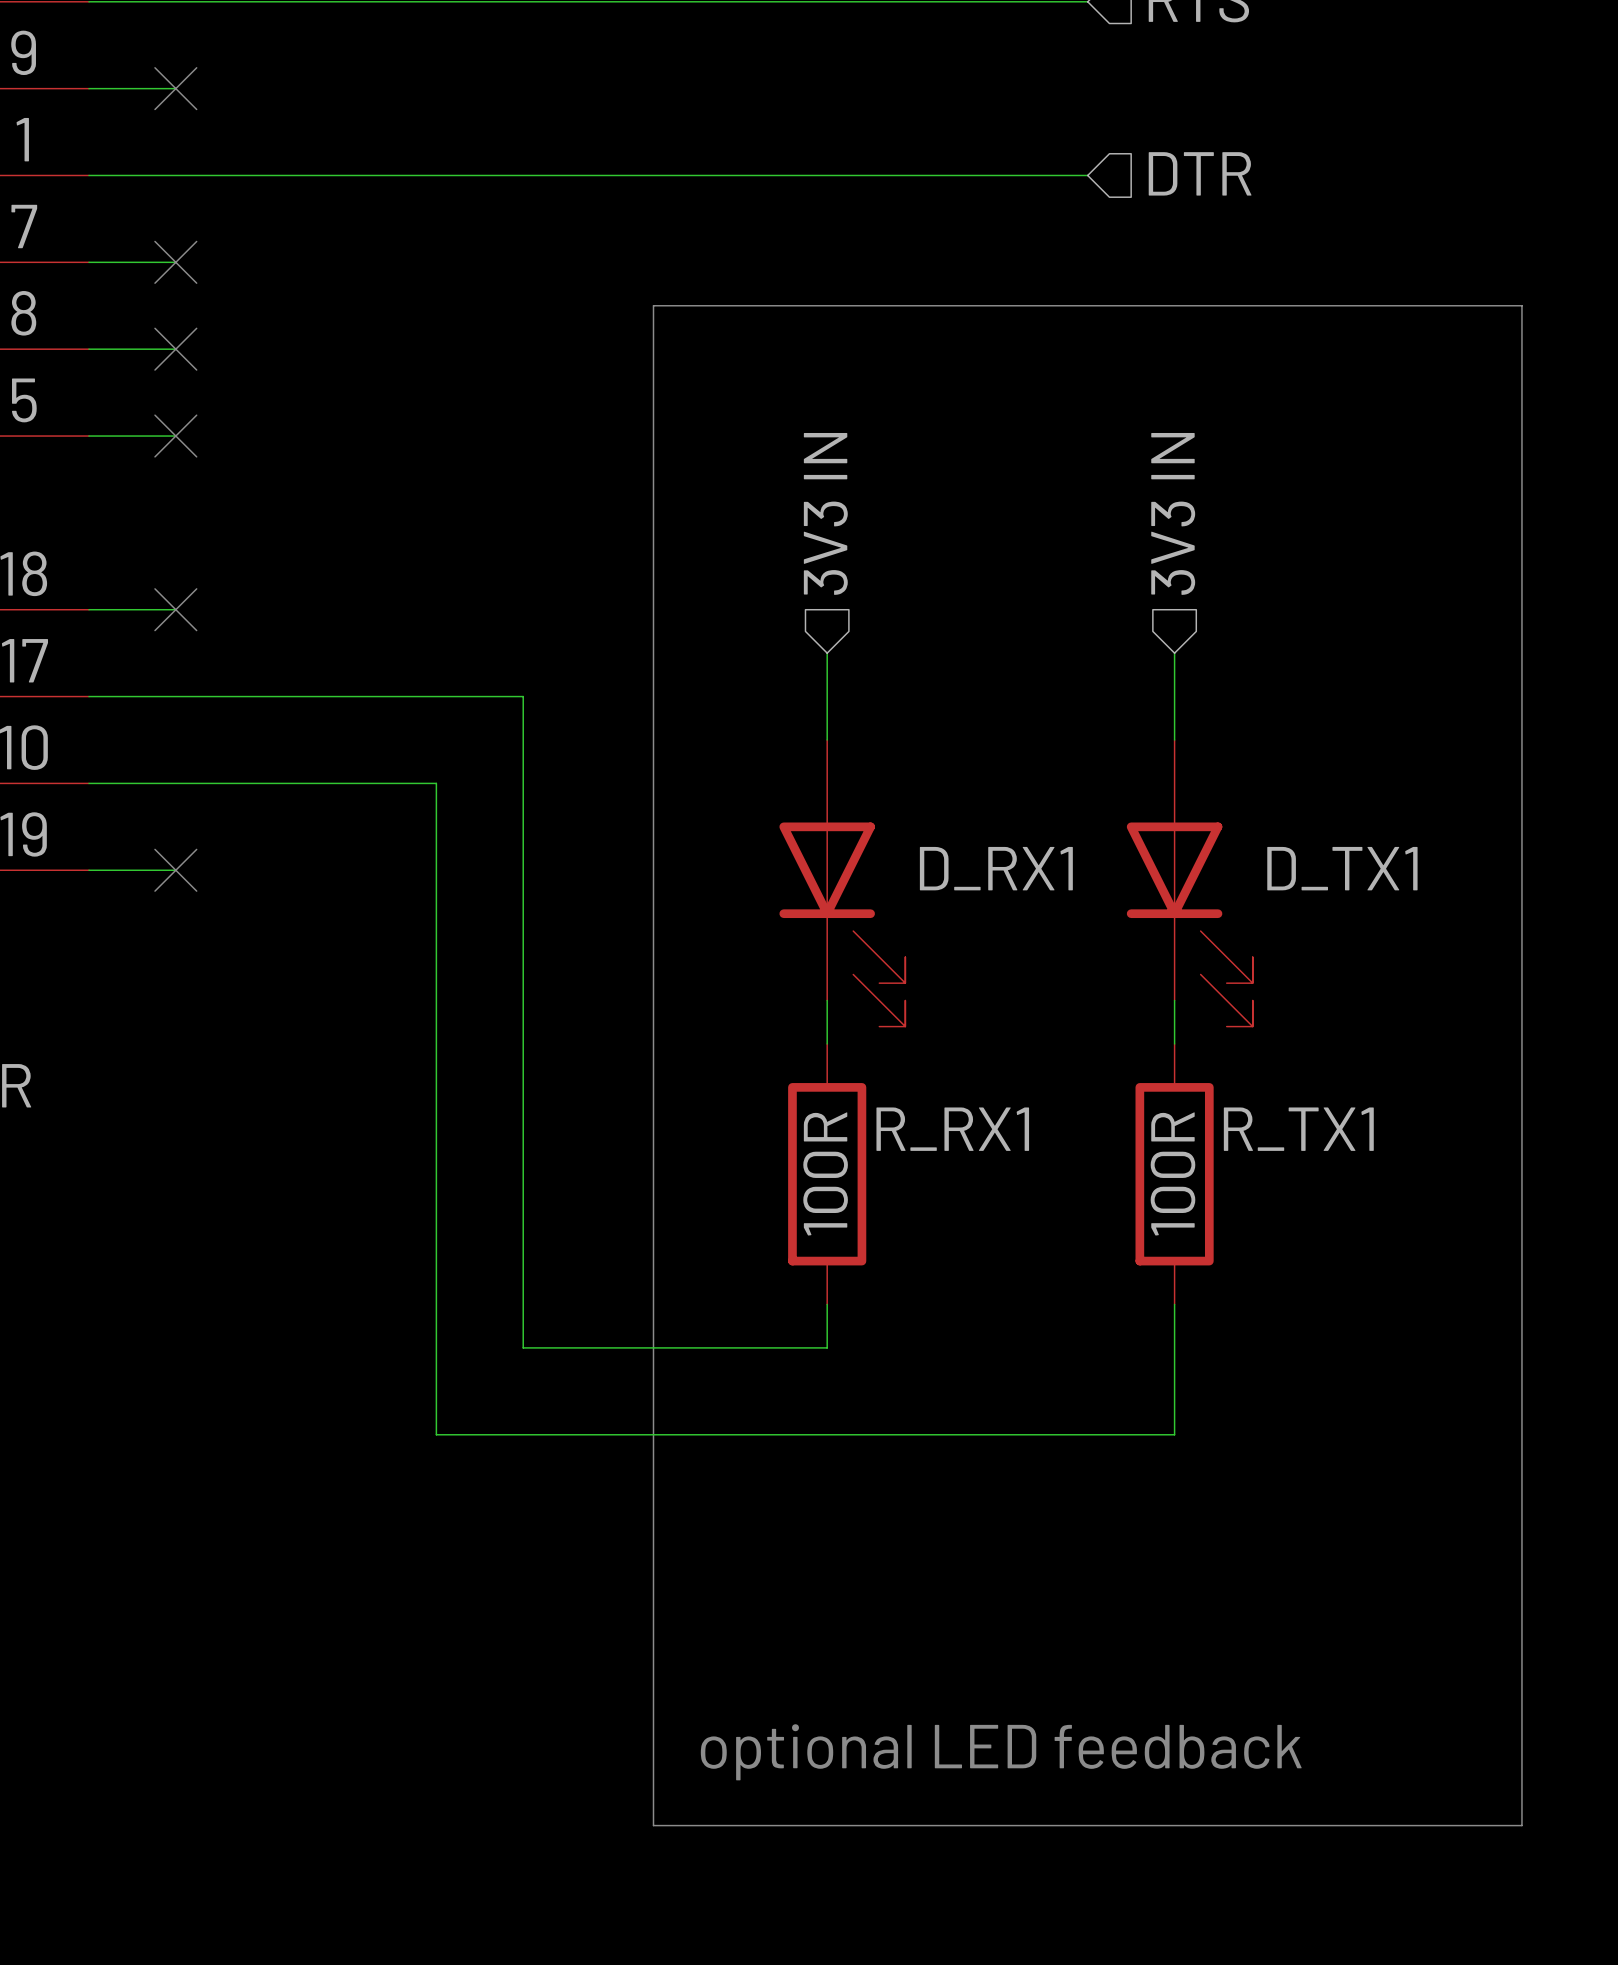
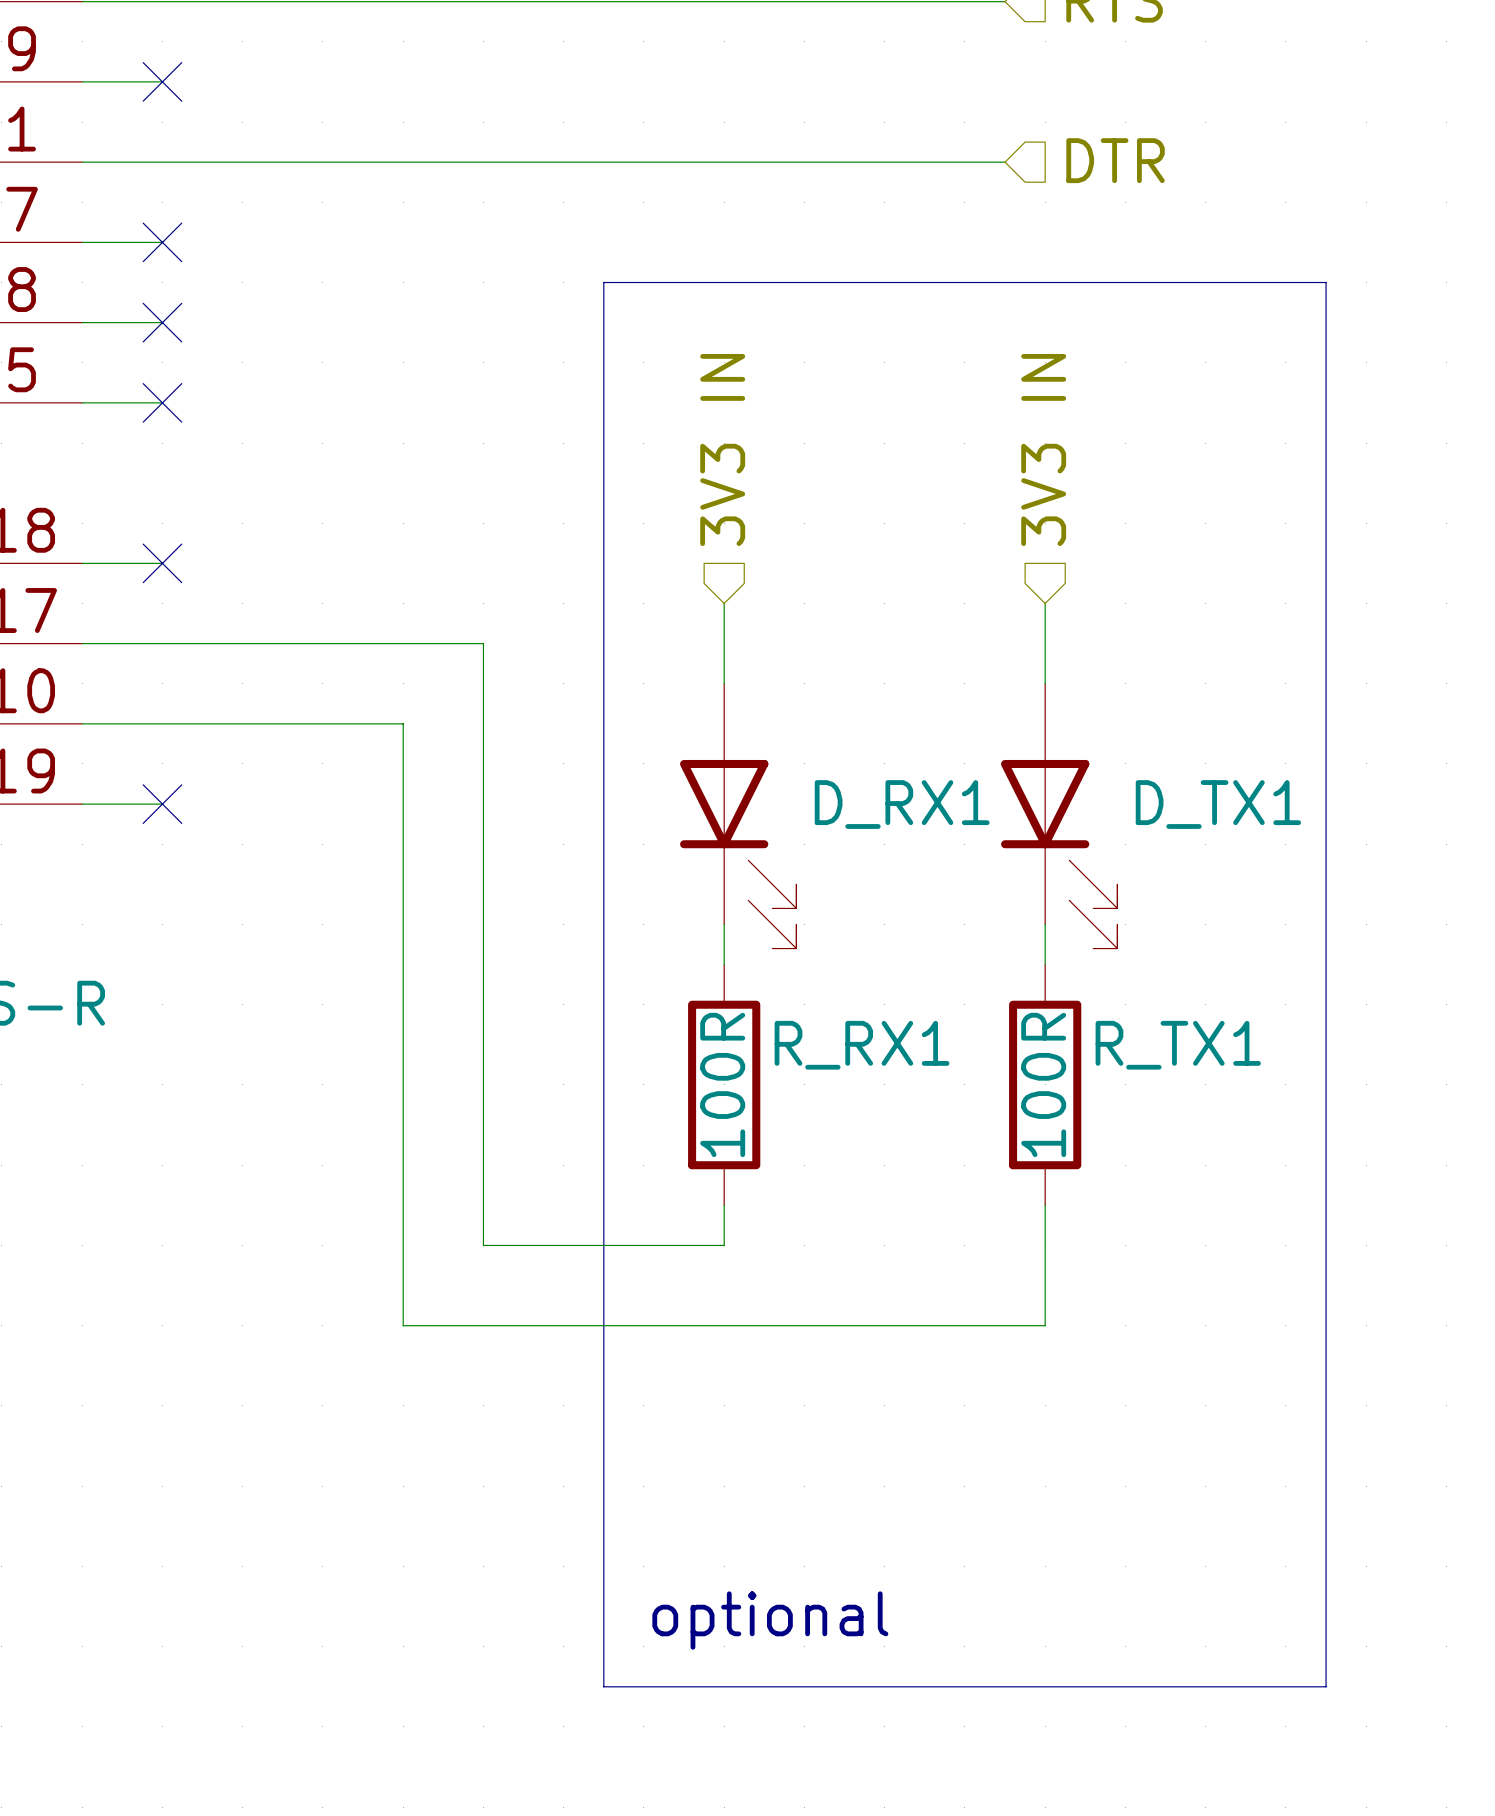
line: (1435, 305) (1521, 305) (1521, 1825) (1435, 1825) -> (1326, 282) (1326, 1686)
hierarchical label position: 3V3 IN (825, 513) -> 3V3 IN (722, 450)
hierarchical label position: 3V3 IN (1173, 513) -> 3V3 IN (1043, 450)
wire: (827, 653) (827, 739) -> (724, 603) (724, 683)
wire: (1174, 653) (1174, 739) -> (1045, 603) (1045, 683)
D_RX1 position: (842, 883) -> (738, 816)
D_TX1 position: (1189, 883) -> (1059, 816)
wire: (827, 1000) (827, 1043) -> (724, 924) (724, 964)
wire: (1174, 1000) (1174, 1043) -> (1045, 924) (1045, 964)
R_RX1 position: (827, 1174) -> (724, 1084)
R_TX1 position: (1174, 1174) -> (1045, 1084)
wire: (827, 1304) (827, 1347) (783, 1347) -> (724, 1205) (724, 1245)
wire: (1174, 1304) (1174, 1434) (1131, 1434) -> (1045, 1205) (1045, 1325)
text: optional LED feedback (1001, 1752) -> optional (770, 1620)

